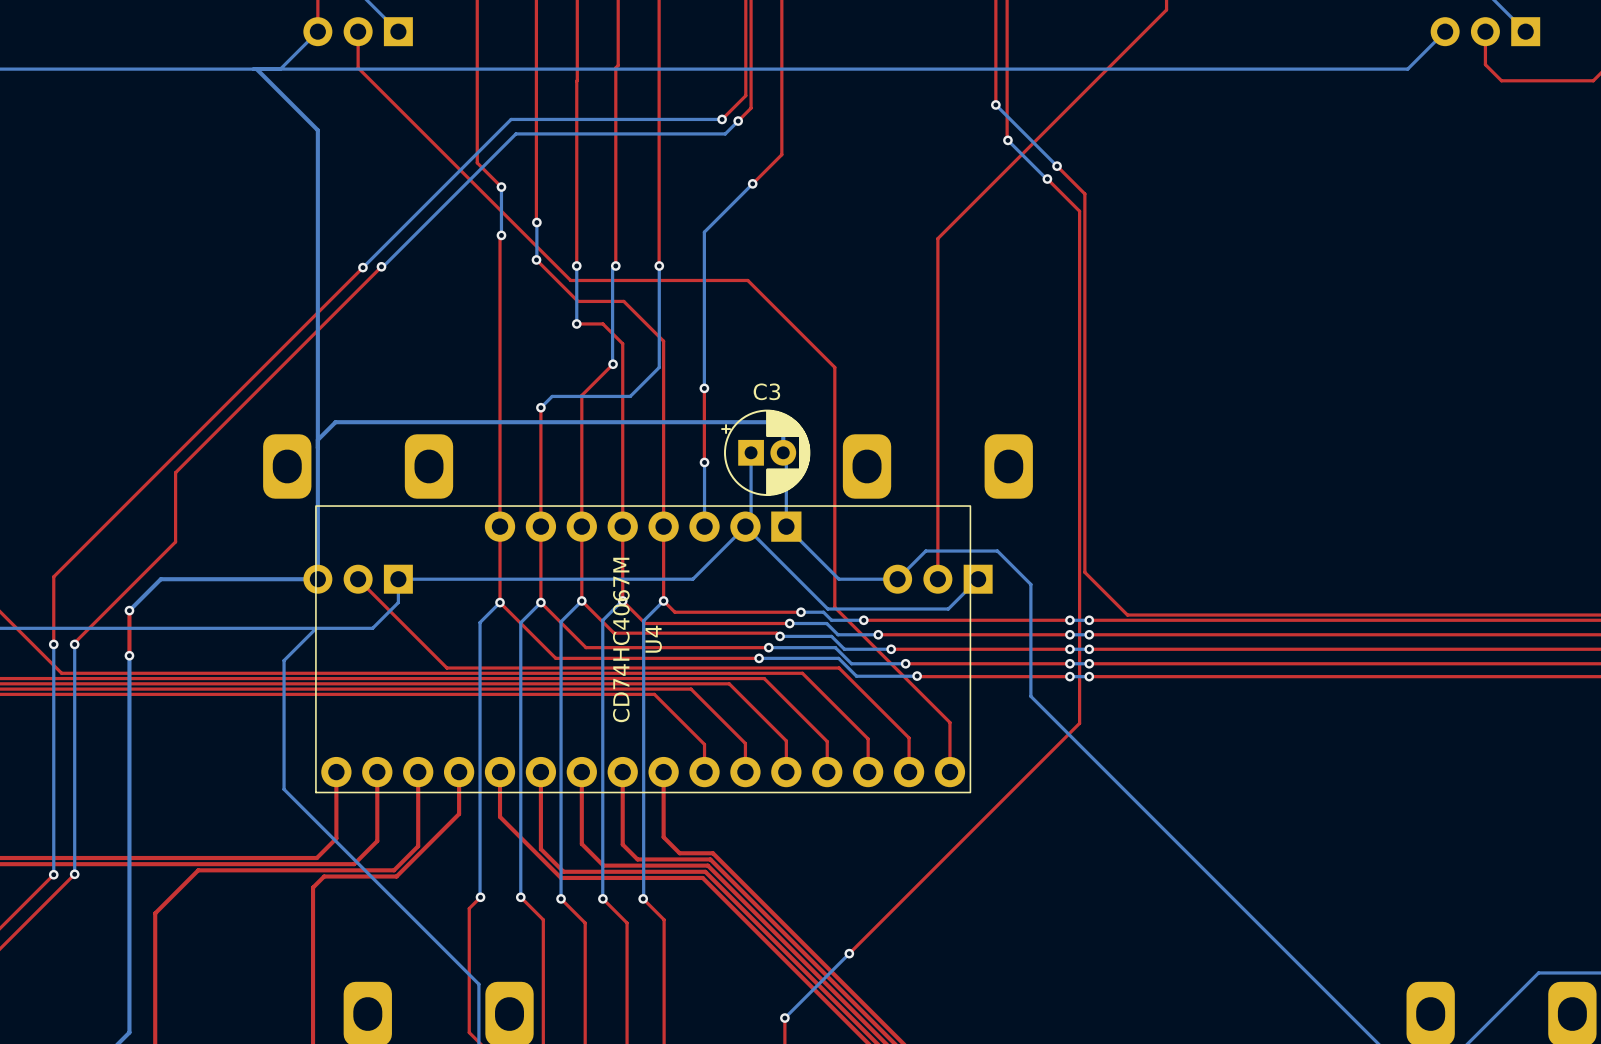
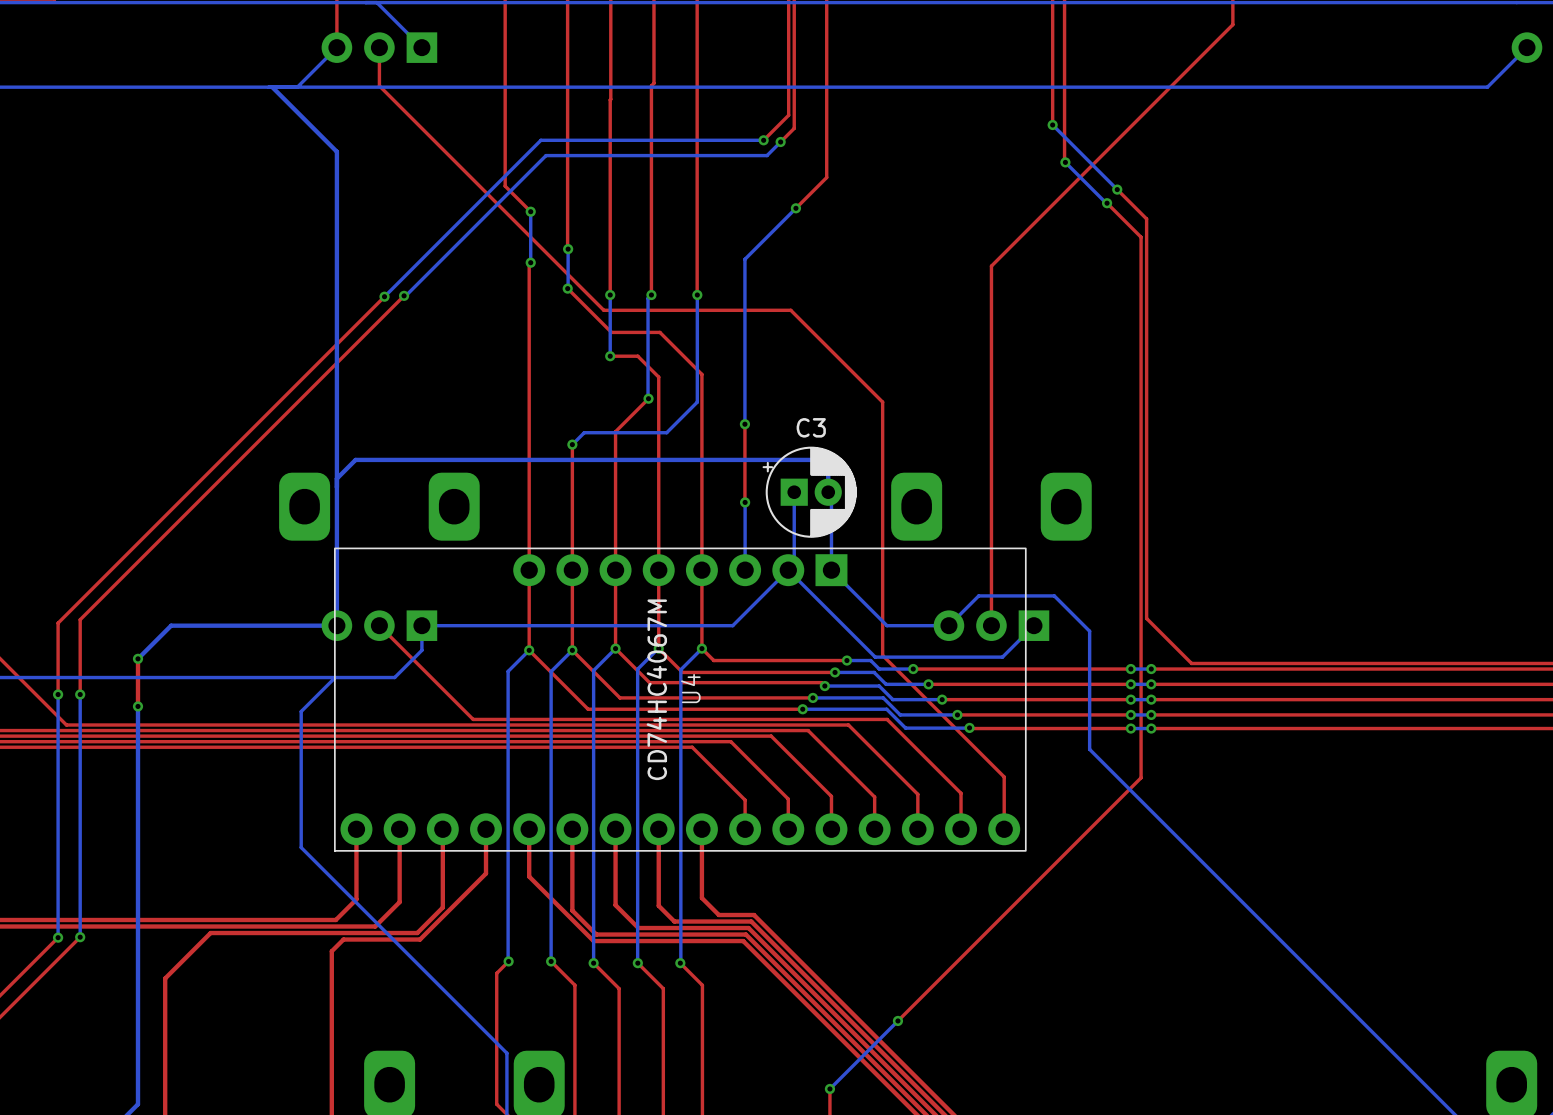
top track: (175, 472) (175, 541) (74, 642) -> (186, 513) (80, 619) (80, 692)

